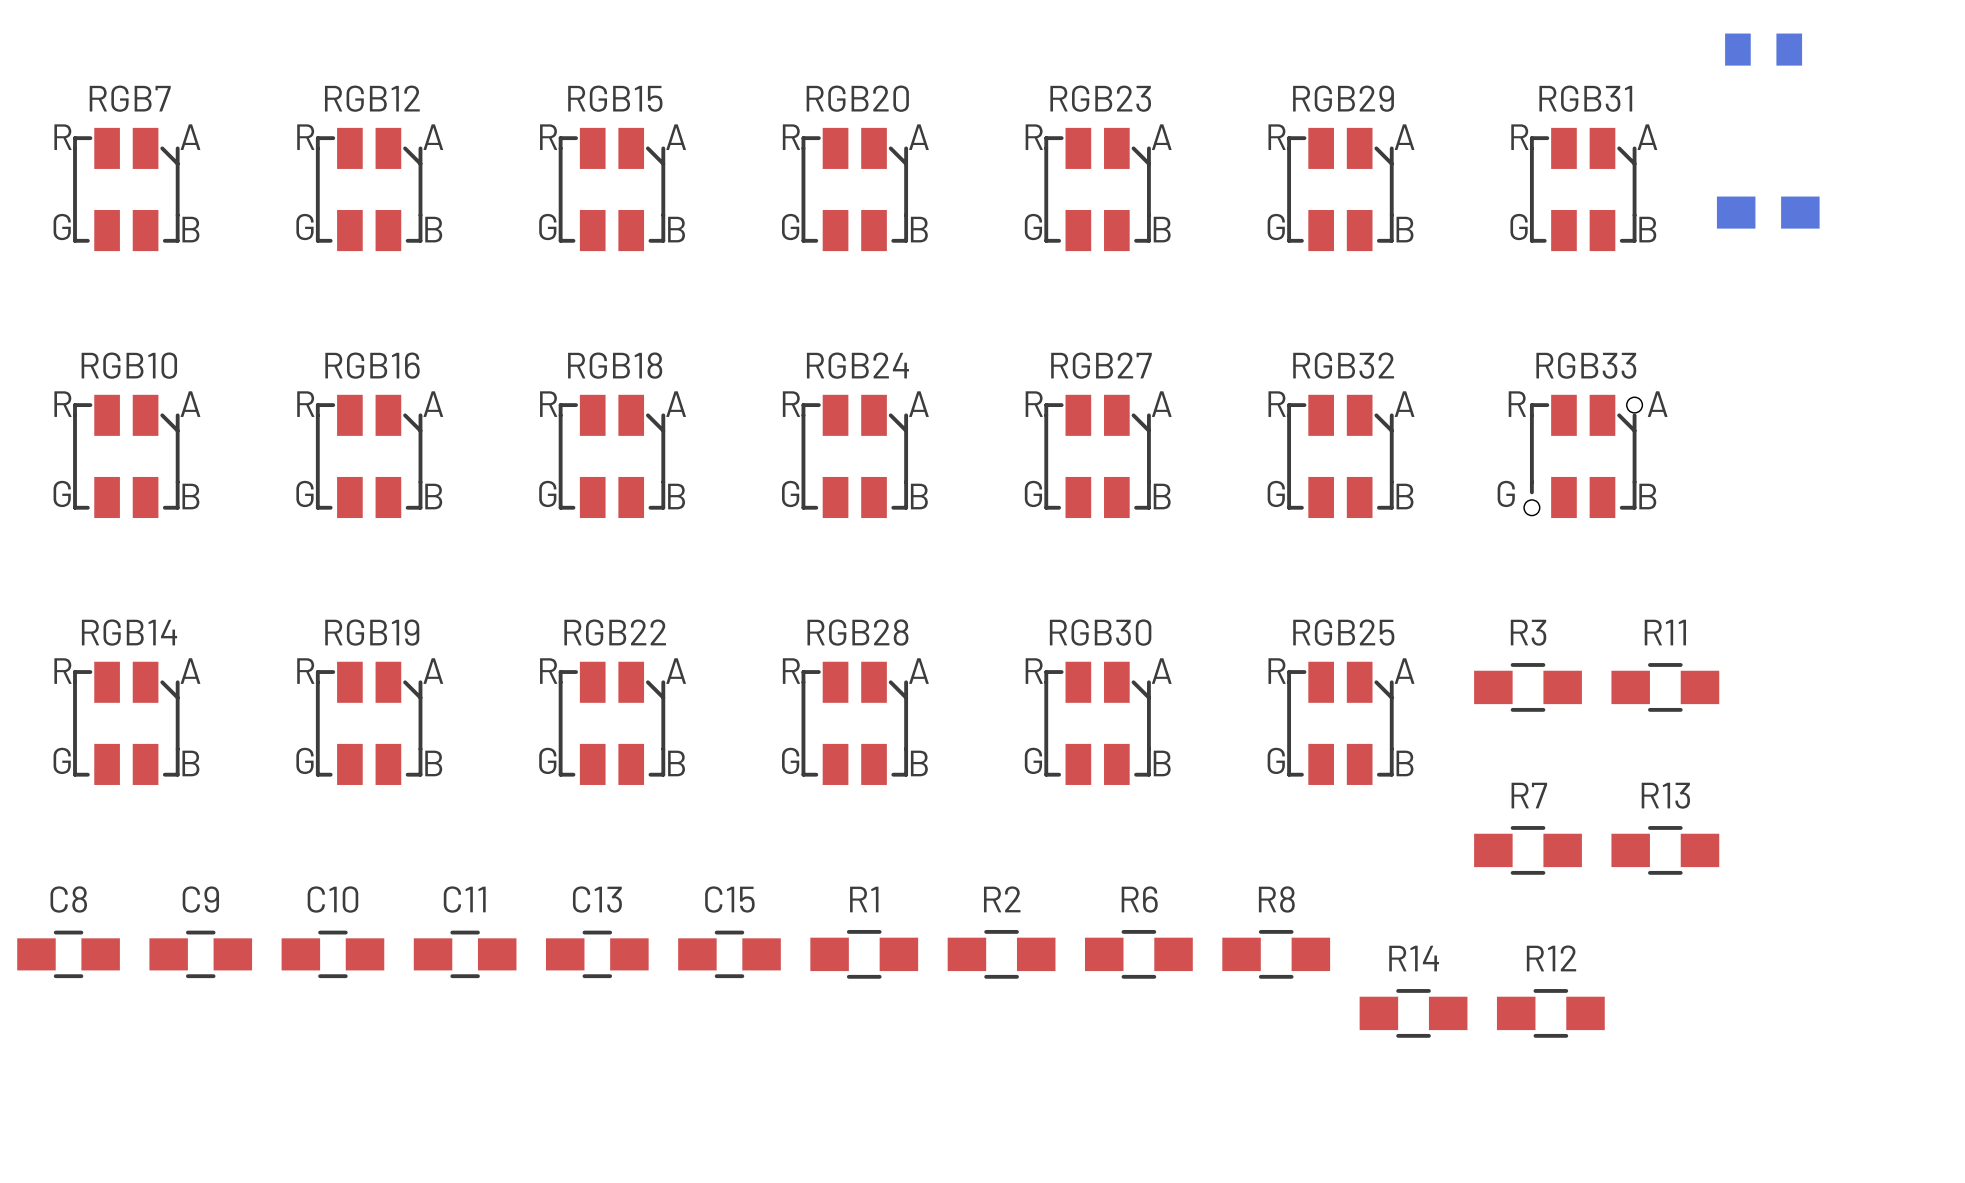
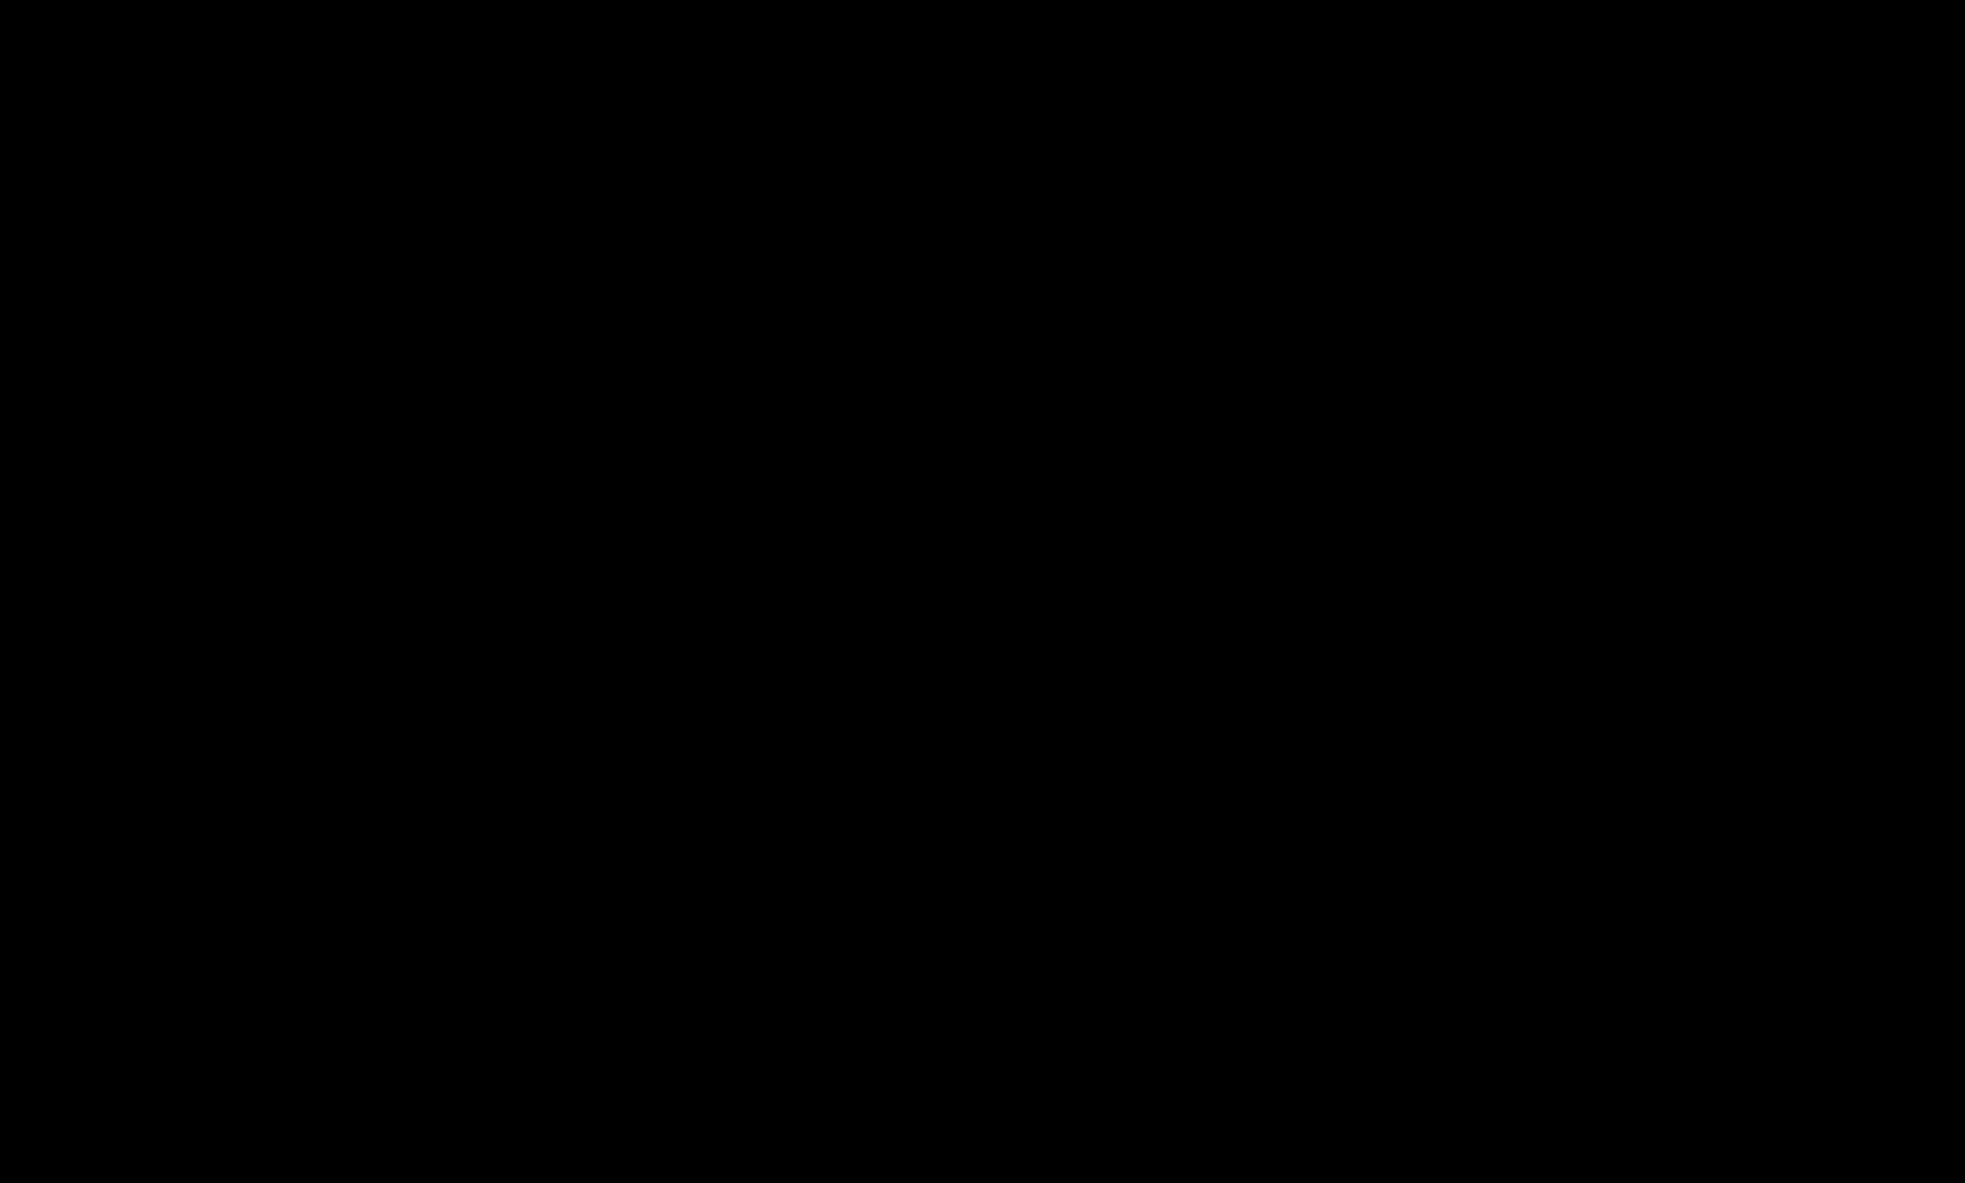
part: (1763, 49) -> none
RGB7: (126, 189) -> none
RGB12: (369, 189) -> none
RGB15: (611, 189) -> none
RGB20: (854, 189) -> none
RGB23: (1097, 189) -> none
RGB29: (1340, 189) -> none
RGB31: (1583, 189) -> none
part: (1768, 212) -> none
RGB10: (126, 456) -> none
RGB16: (369, 456) -> none
RGB18: (611, 456) -> none
RGB24: (854, 456) -> none
RGB27: (1097, 456) -> none
RGB32: (1340, 456) -> none
RGB33: (1583, 456) -> none
R3: (1528, 687) -> none
R11: (1665, 687) -> none
RGB14: (126, 723) -> none
RGB19: (369, 723) -> none
RGB22: (611, 723) -> none
RGB28: (854, 723) -> none
RGB30: (1097, 723) -> none
RGB25: (1340, 723) -> none
R7: (1528, 850) -> none
R13: (1665, 850) -> none
C8: (68, 954) -> none
C9: (200, 954) -> none
C10: (332, 954) -> none
C11: (465, 954) -> none
C13: (597, 954) -> none
C15: (729, 954) -> none
R1: (864, 954) -> none
R2: (1001, 954) -> none
R6: (1138, 954) -> none
R8: (1276, 954) -> none
R14: (1413, 1013) -> none
R12: (1550, 1013) -> none

